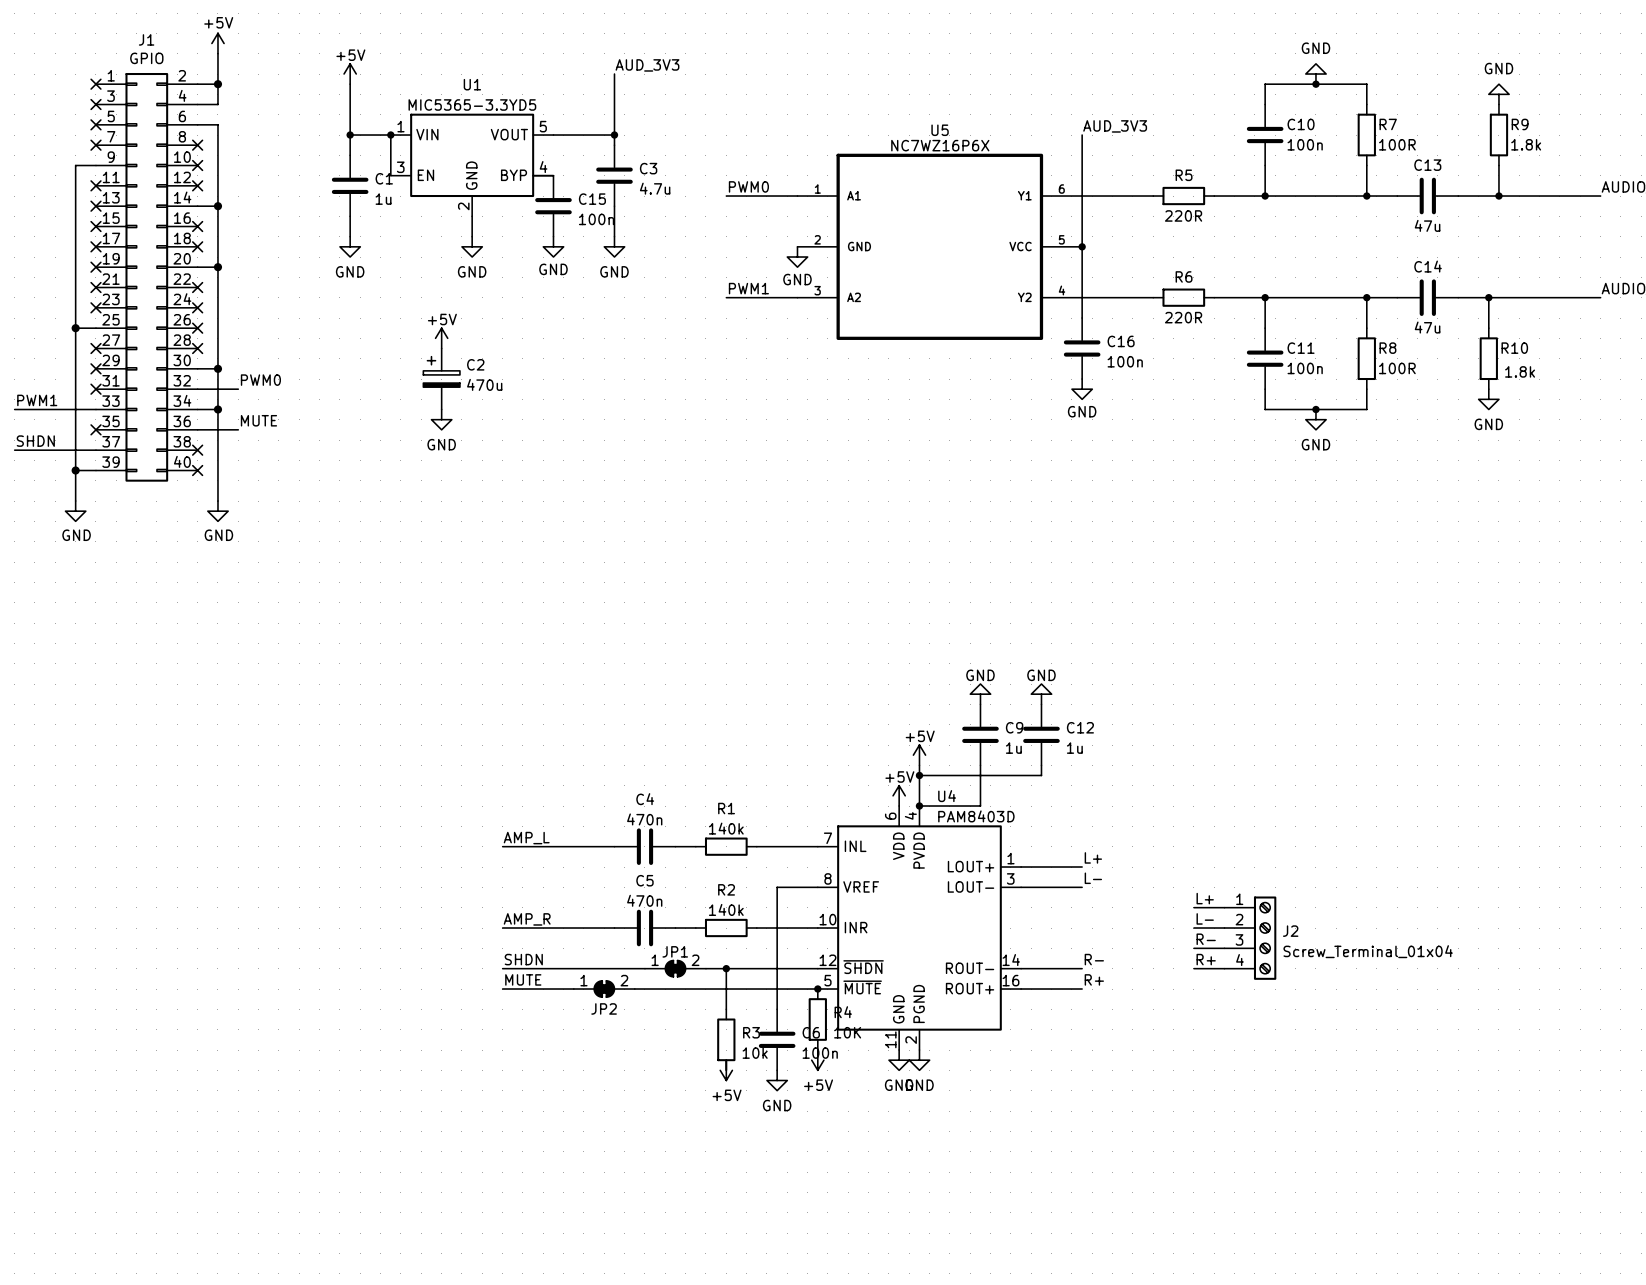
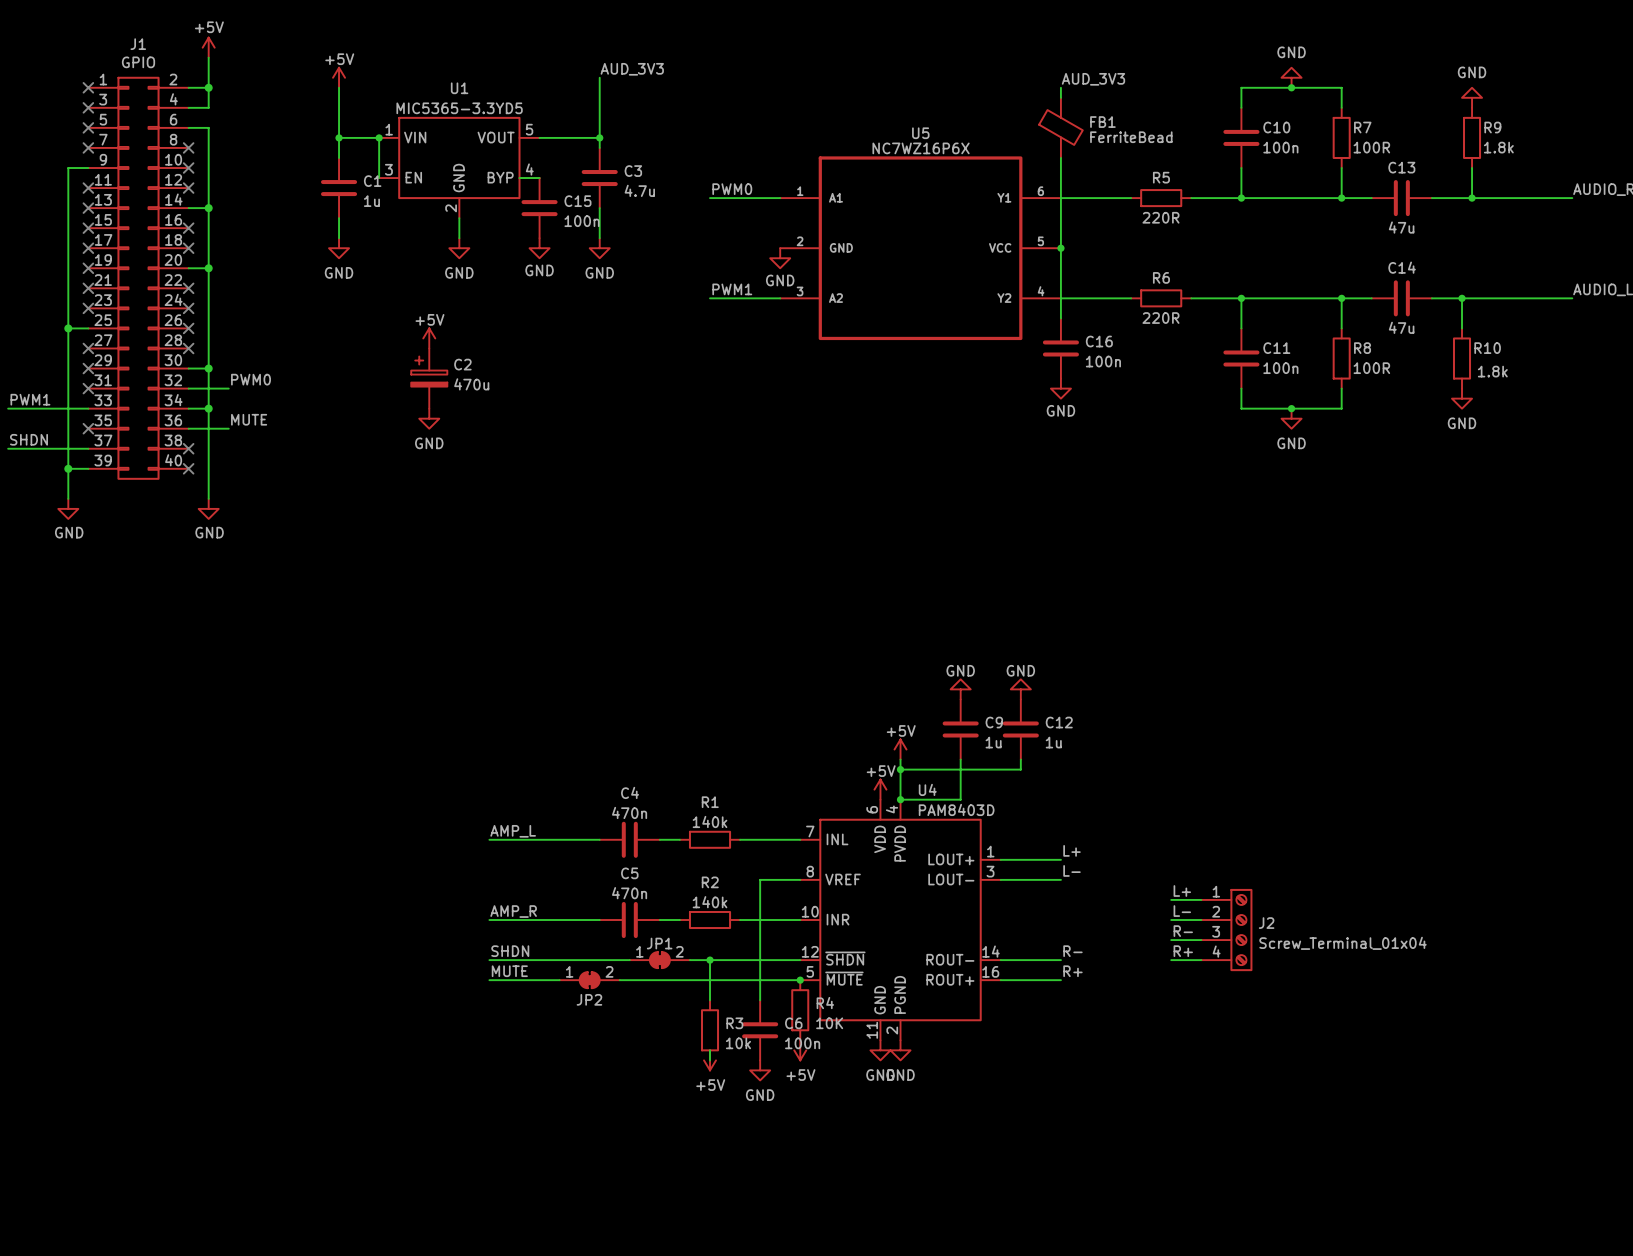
wire: none -> (1060, 87) (1060, 97)
FB1: none -> FerriteBead (1060, 127)
label position: AUD_3V3 (1115, 126) -> AUD_3V3 (1093, 79)

